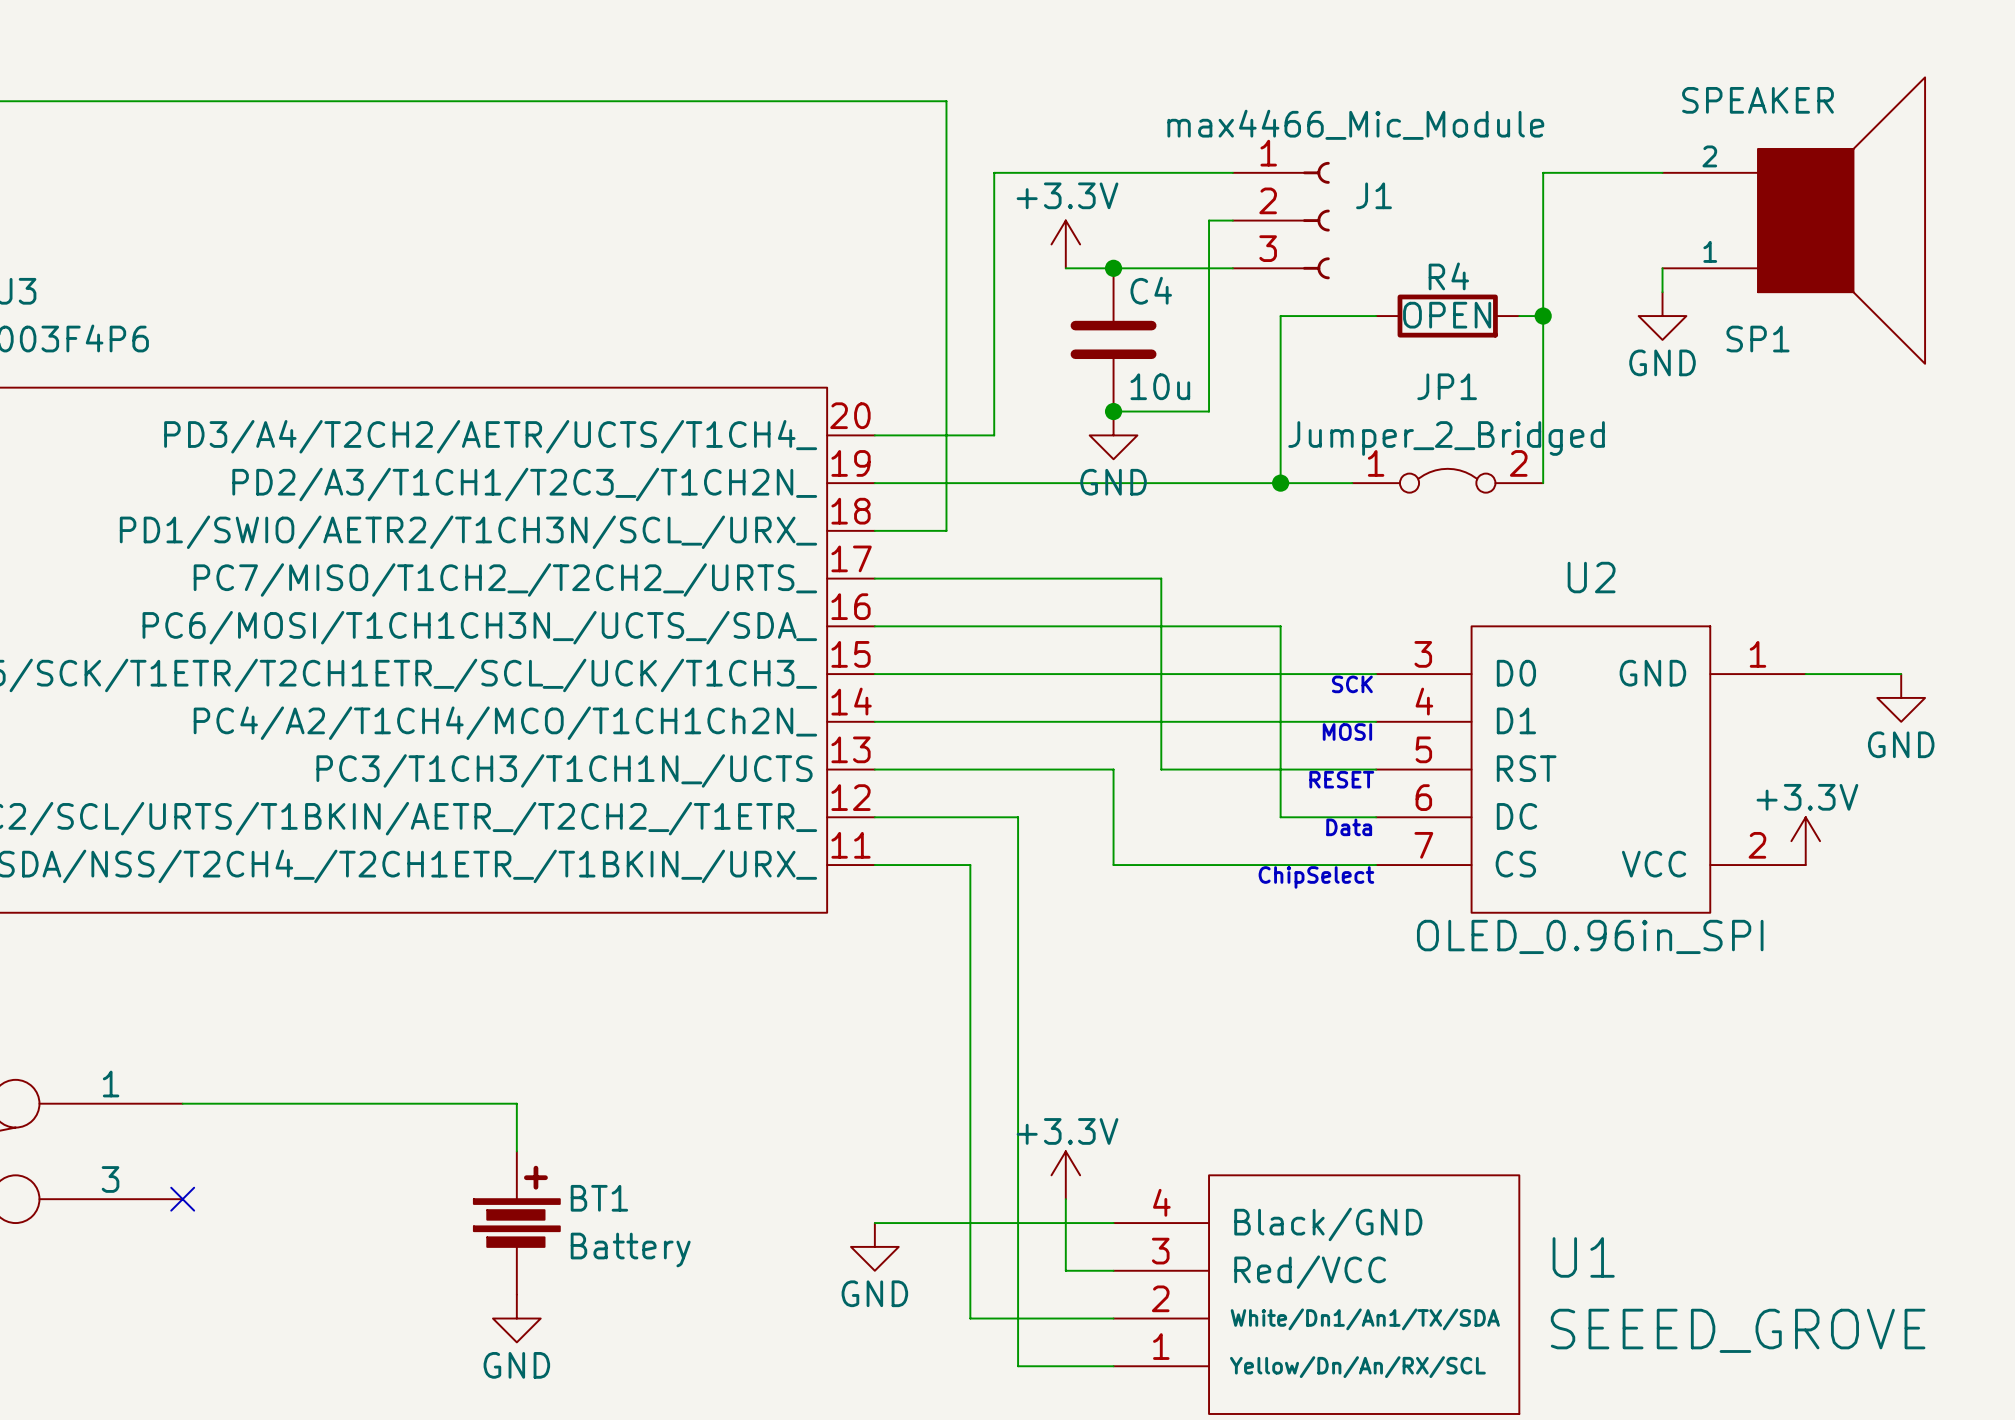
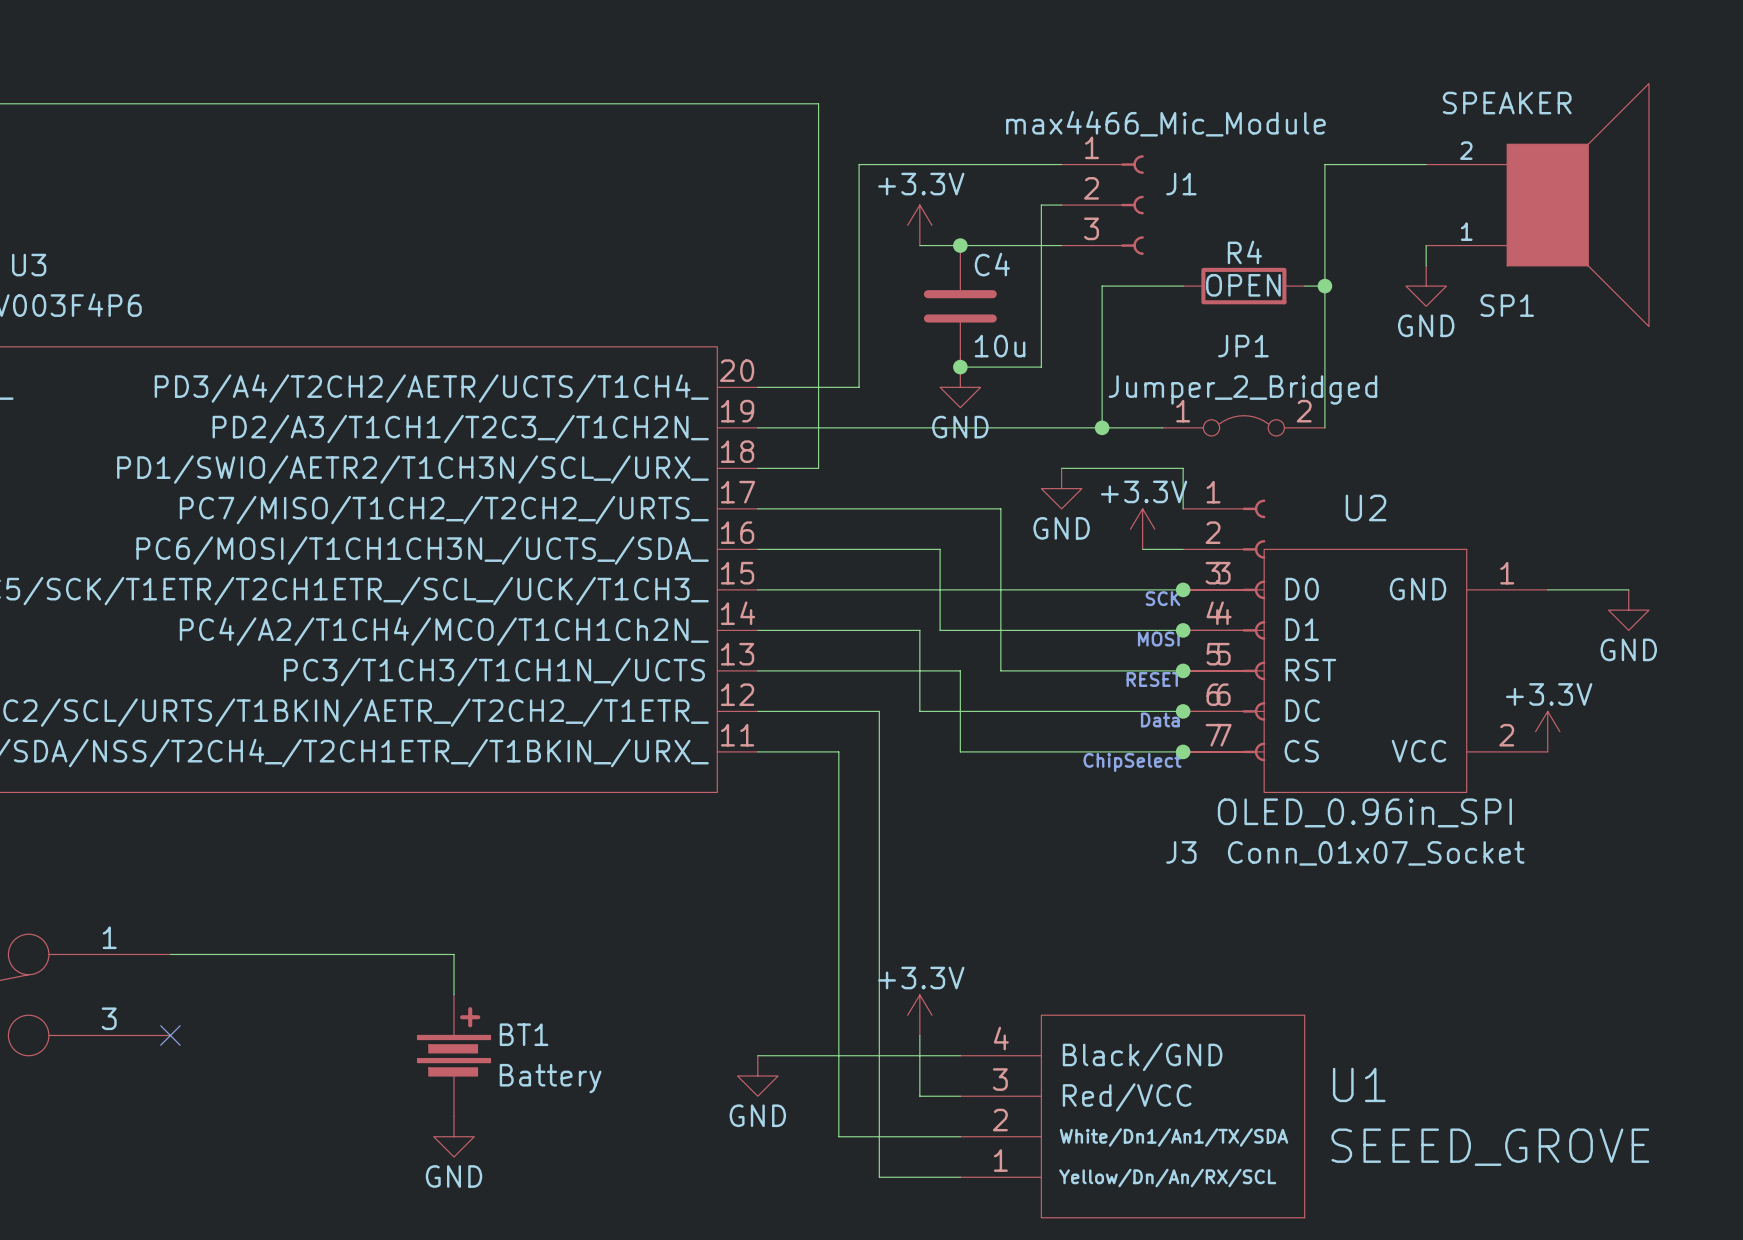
wire: none -> (1061, 468) (1183, 468) (1183, 508)
power symbol: none -> GND (1061, 488)
power symbol: none -> +3.3V (1142, 529)
wire: (1089, 626) (1280, 626) (1280, 817) -> (919, 630) (919, 711) (1102, 711)
wire: none -> (1142, 549) (1183, 549)
junction: none -> (1183, 589)
wire: (1065, 721) (1089, 721) -> (940, 549) (940, 630)
junction: none -> (1183, 630)
J3: none -> Conn_01x07_Socket (1224, 630)
junction: none -> (1183, 670)
junction: none -> (1183, 711)
junction: none -> (1183, 751)

